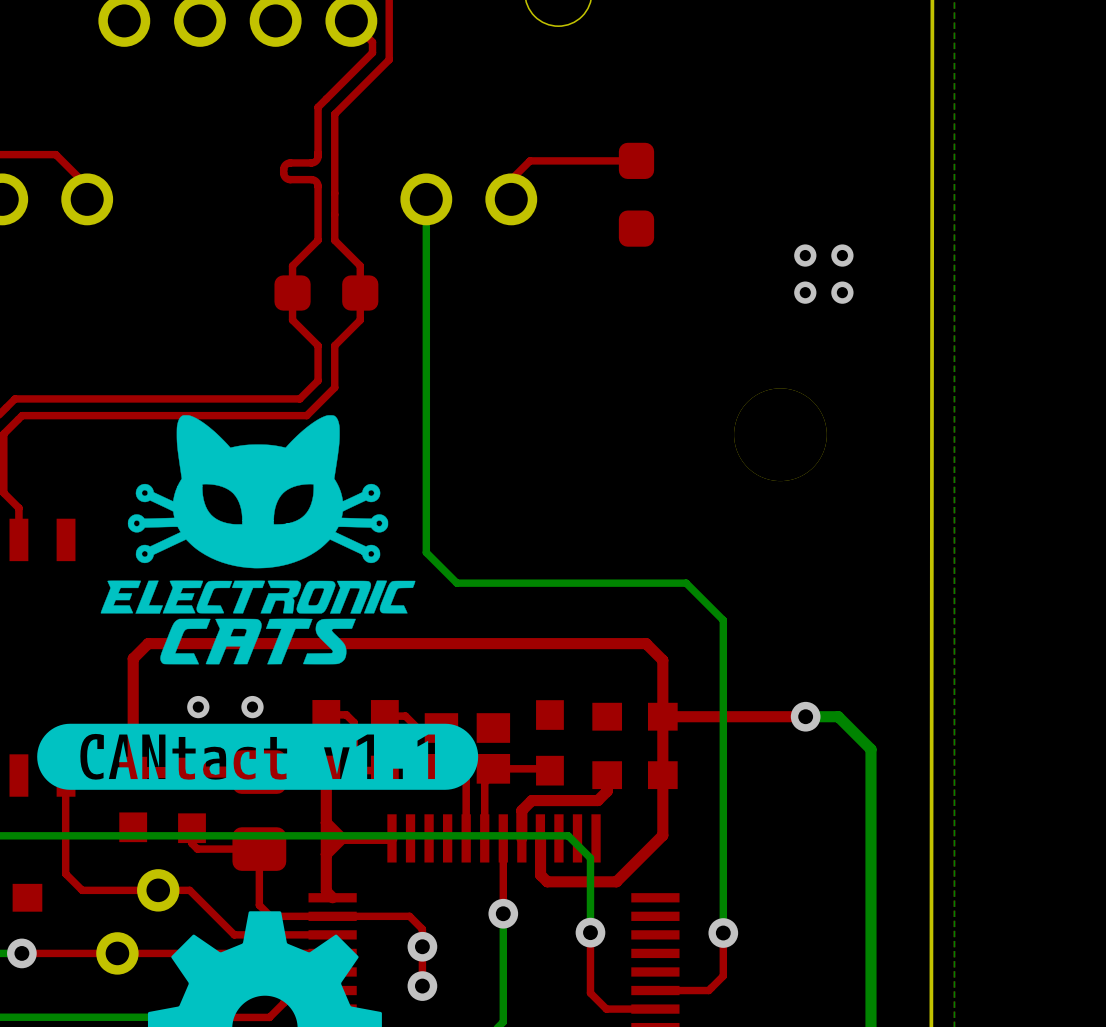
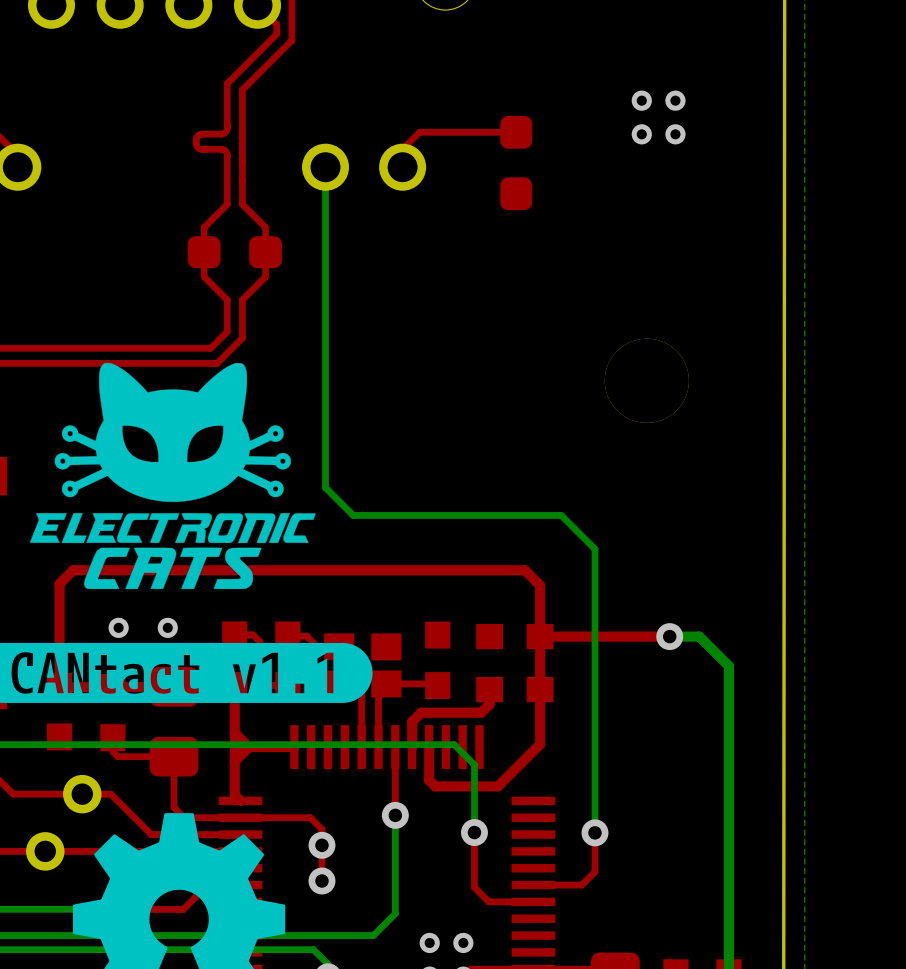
via: none -> (641, 100)
via: none -> (675, 100)
via: none -> (641, 134)
via: none -> (675, 134)
via: (805, 255) -> none
via: (842, 255) -> none
via: (805, 292) -> none
via: (842, 292) -> none

